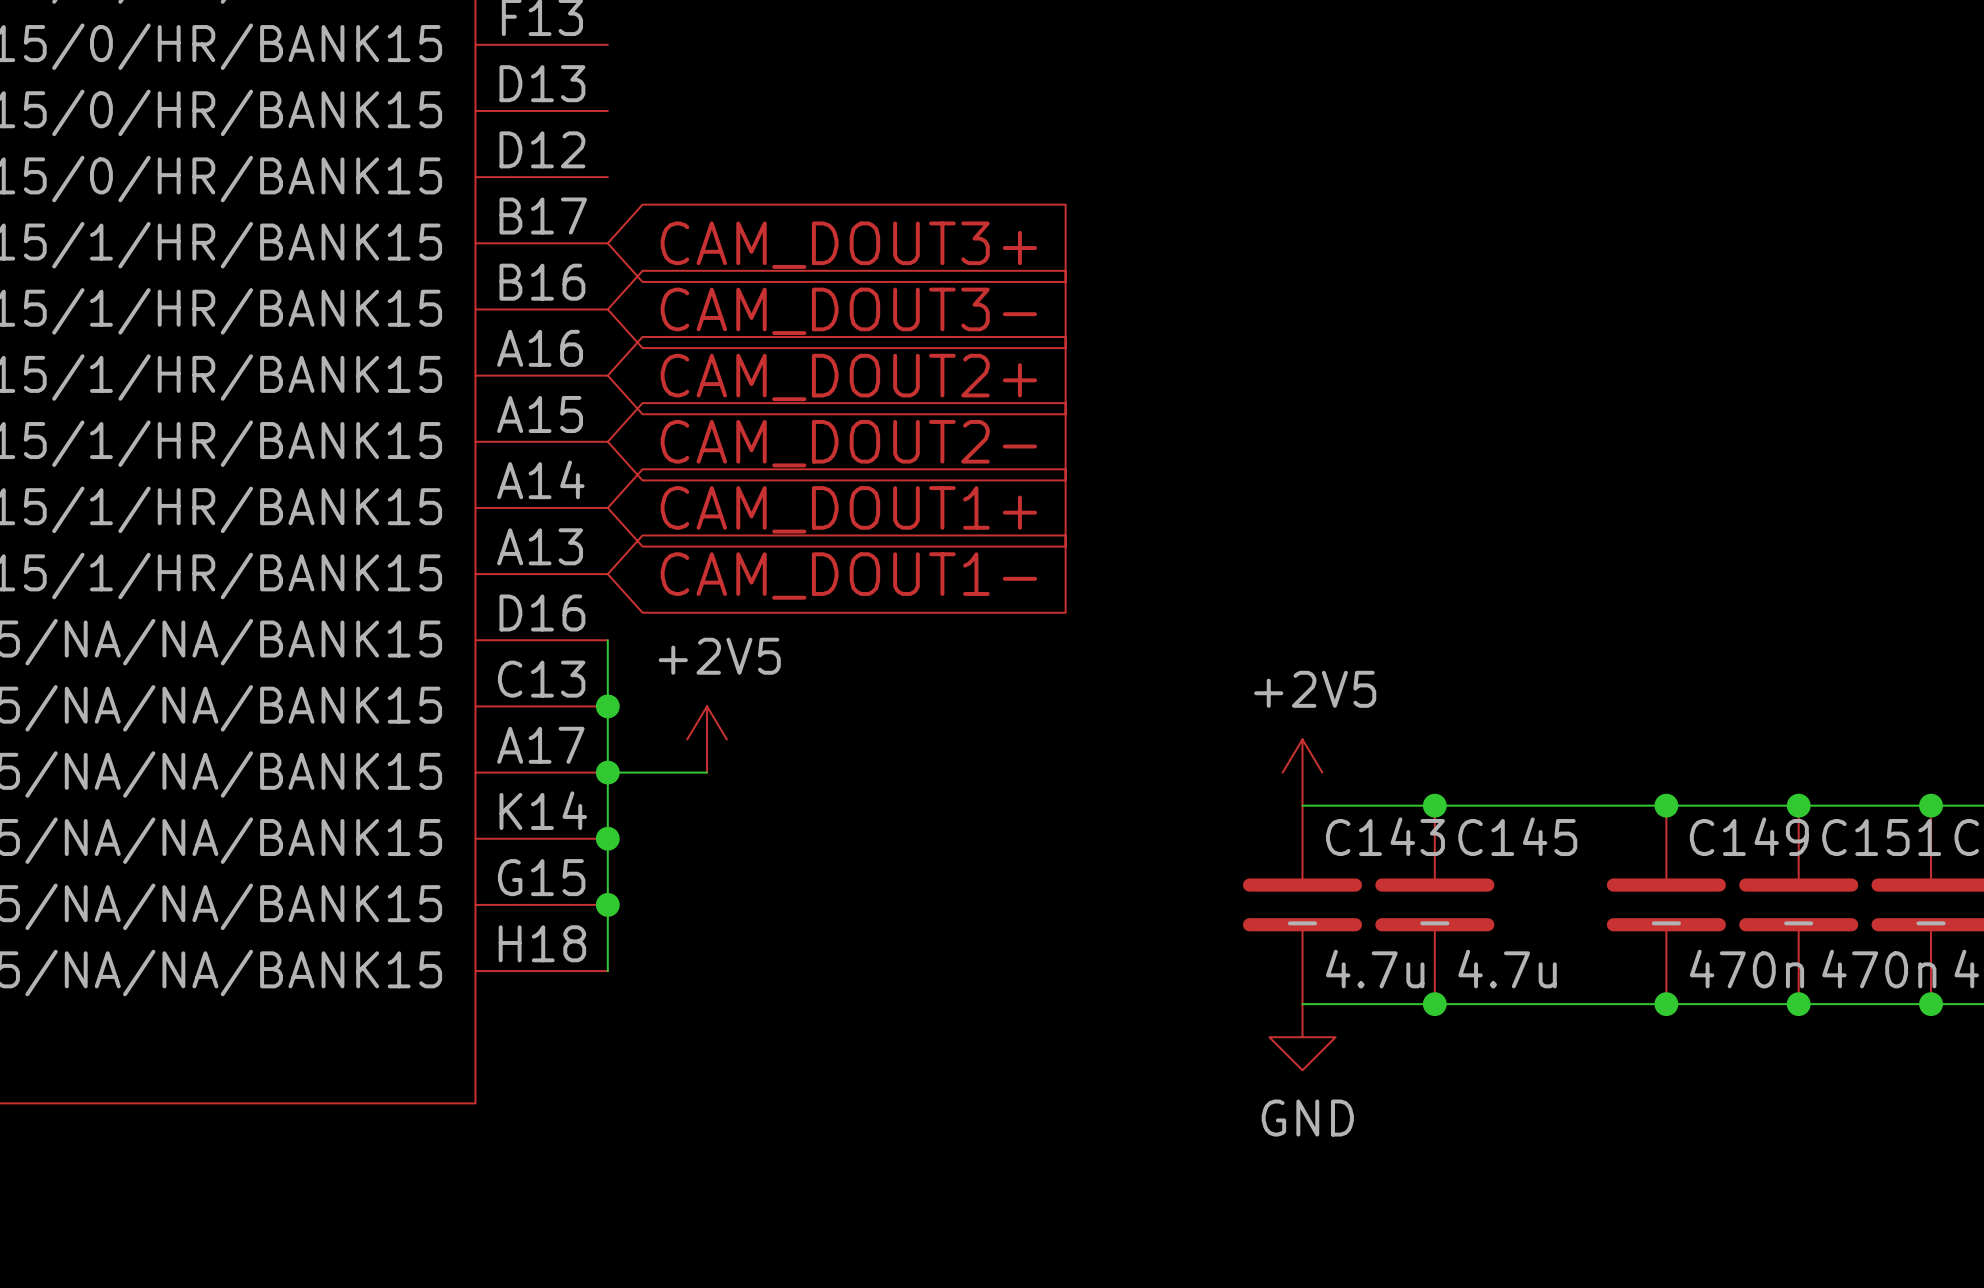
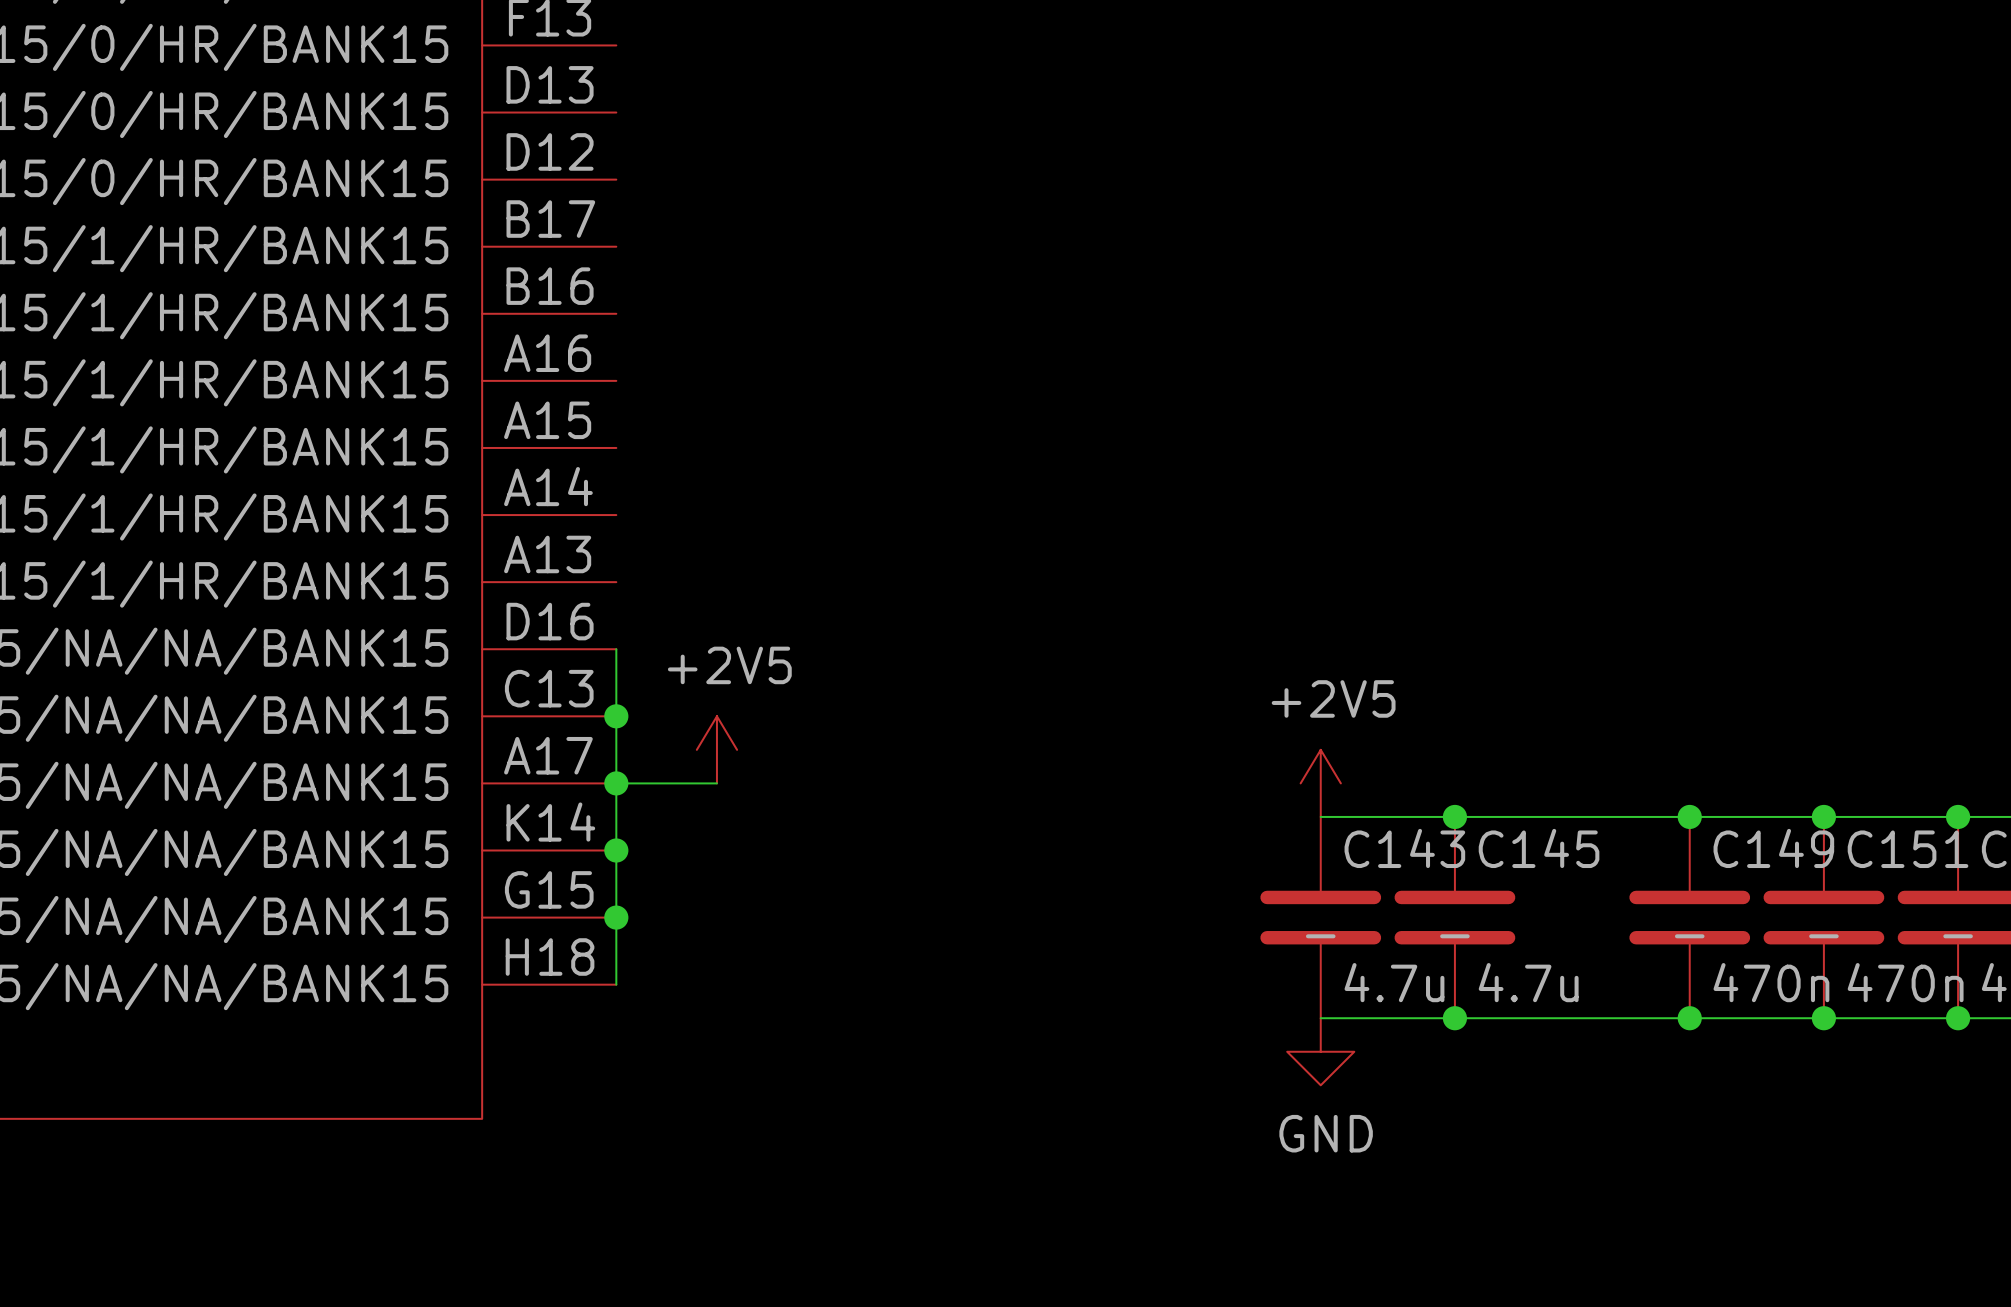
global label: CAM_DOUT3+ (848, 245) -> none
global label: CAM_DOUT3- (848, 311) -> none
global label: CAM_DOUT2+ (848, 377) -> none
global label: CAM_DOUT2- (848, 443) -> none
global label: CAM_DOUT1+ (848, 509) -> none
global label: CAM_DOUT1- (848, 575) -> none

